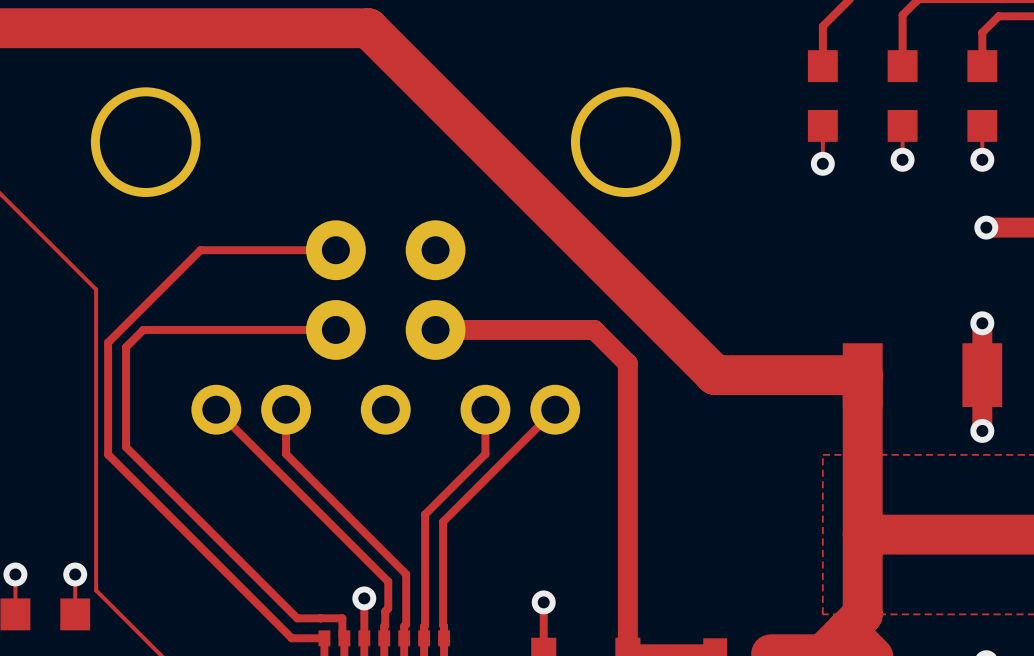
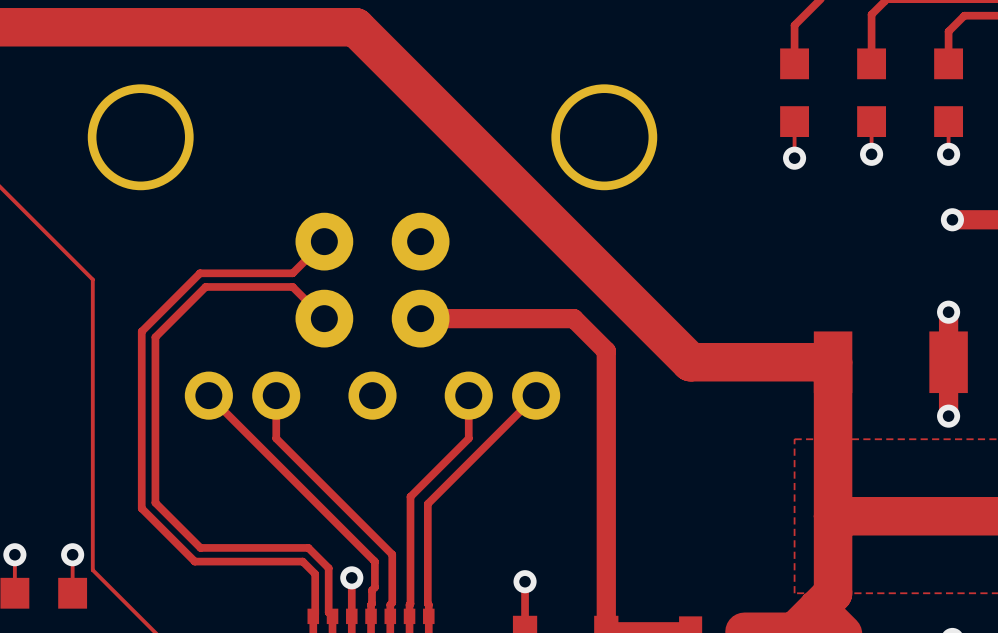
top track: (335, 250) (200, 250) (108, 342) (108, 454) (291, 638) (324, 638) -> (324, 241) (292, 273) (200, 273) (141, 331) (141, 508) (194, 561) (302, 561) (315, 574) (315, 614) (313, 616)
top track: (335, 329) (143, 329) (126, 347) (126, 447) (297, 618) (342, 618) (342, 636) -> (324, 318) (292, 286) (205, 286) (155, 337) (155, 502) (200, 547) (308, 547) (328, 568) (328, 612) (332, 616)

